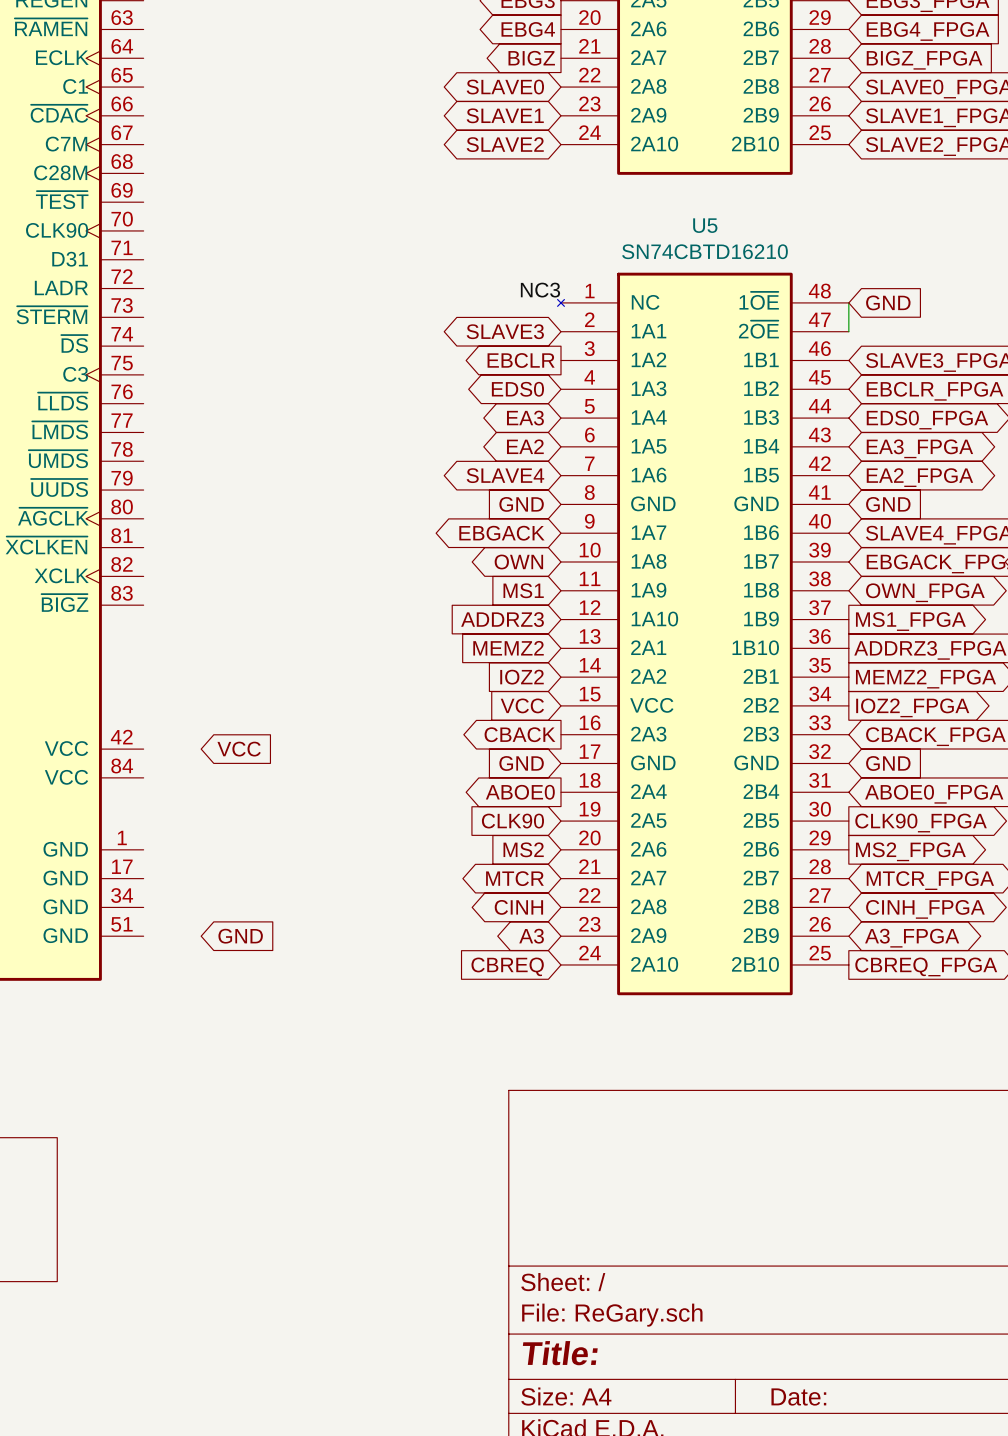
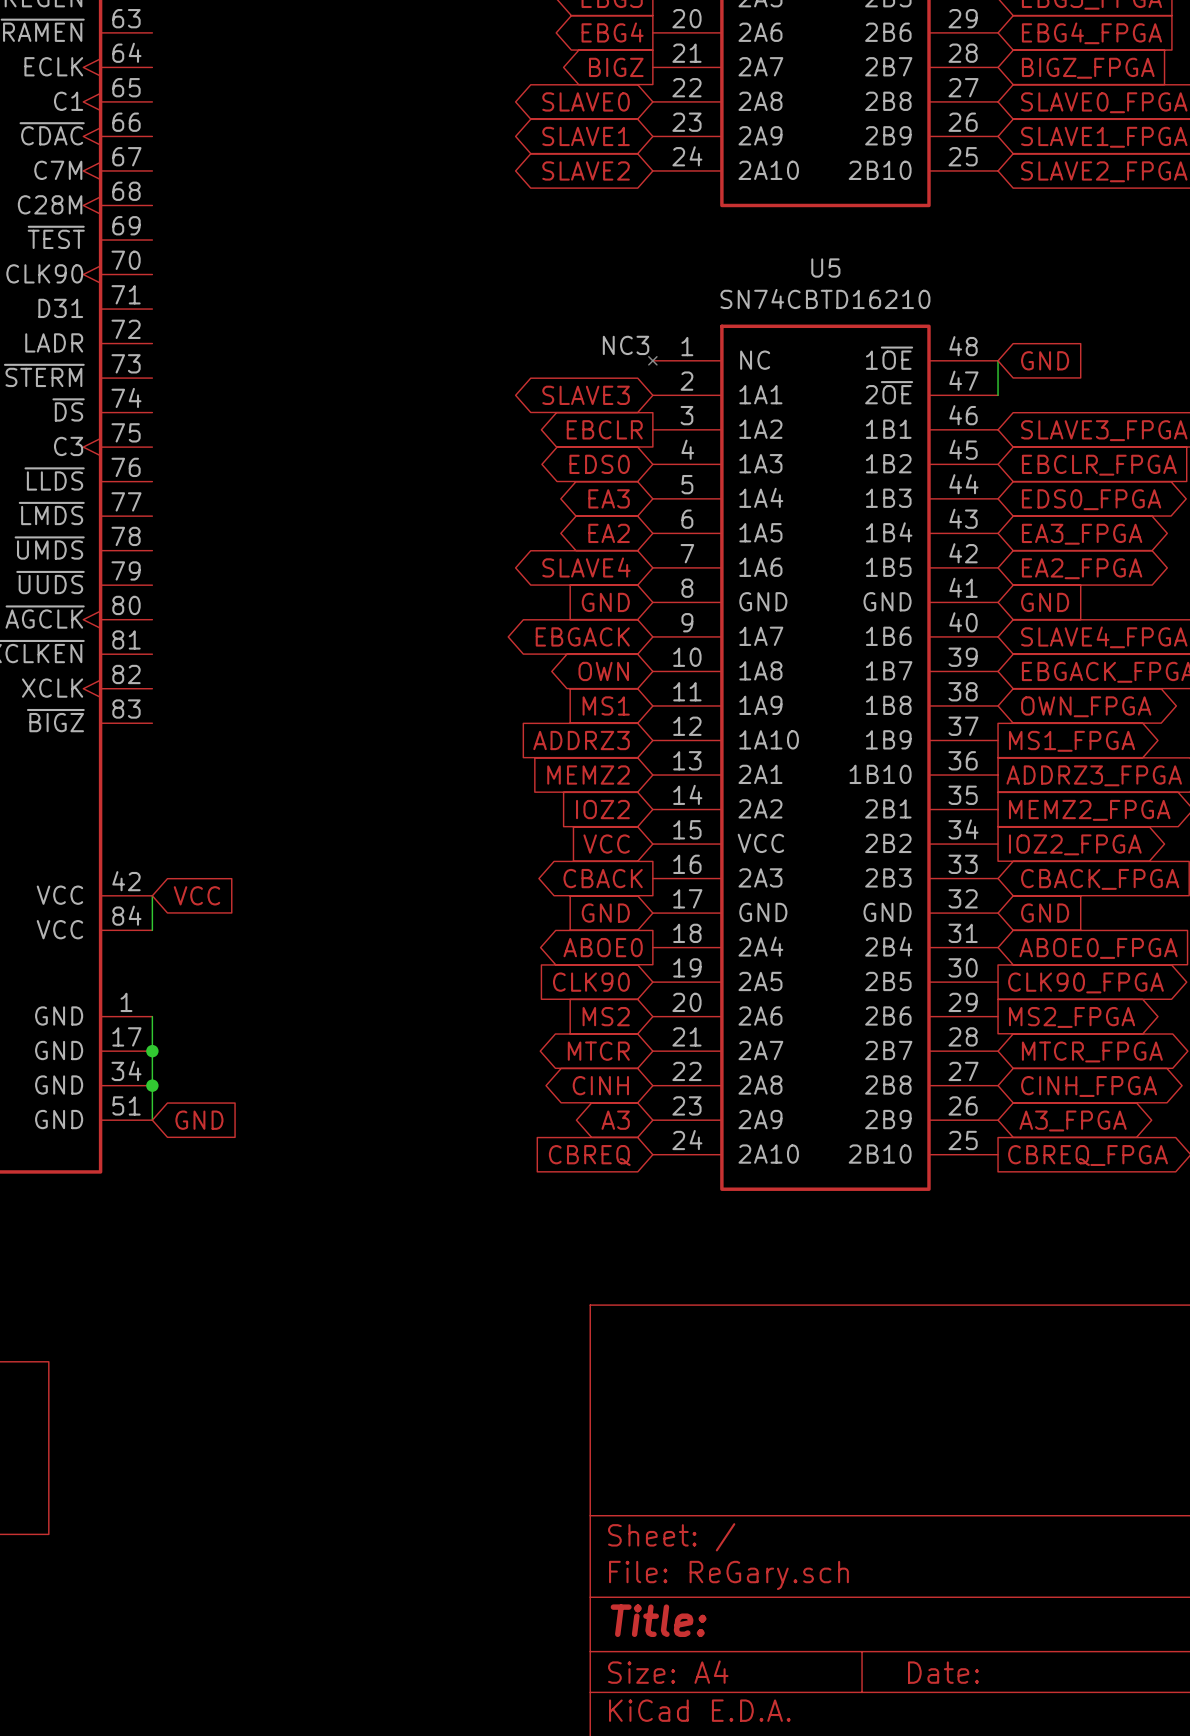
wire: none -> (152, 895) (152, 930)
global label position: VCC (239, 749) -> VCC (196, 895)
wire: none -> (152, 1016) (152, 1120)
junction: none -> (152, 1051)
junction: none -> (152, 1085)
global label position: GND (240, 936) -> GND (199, 1120)

